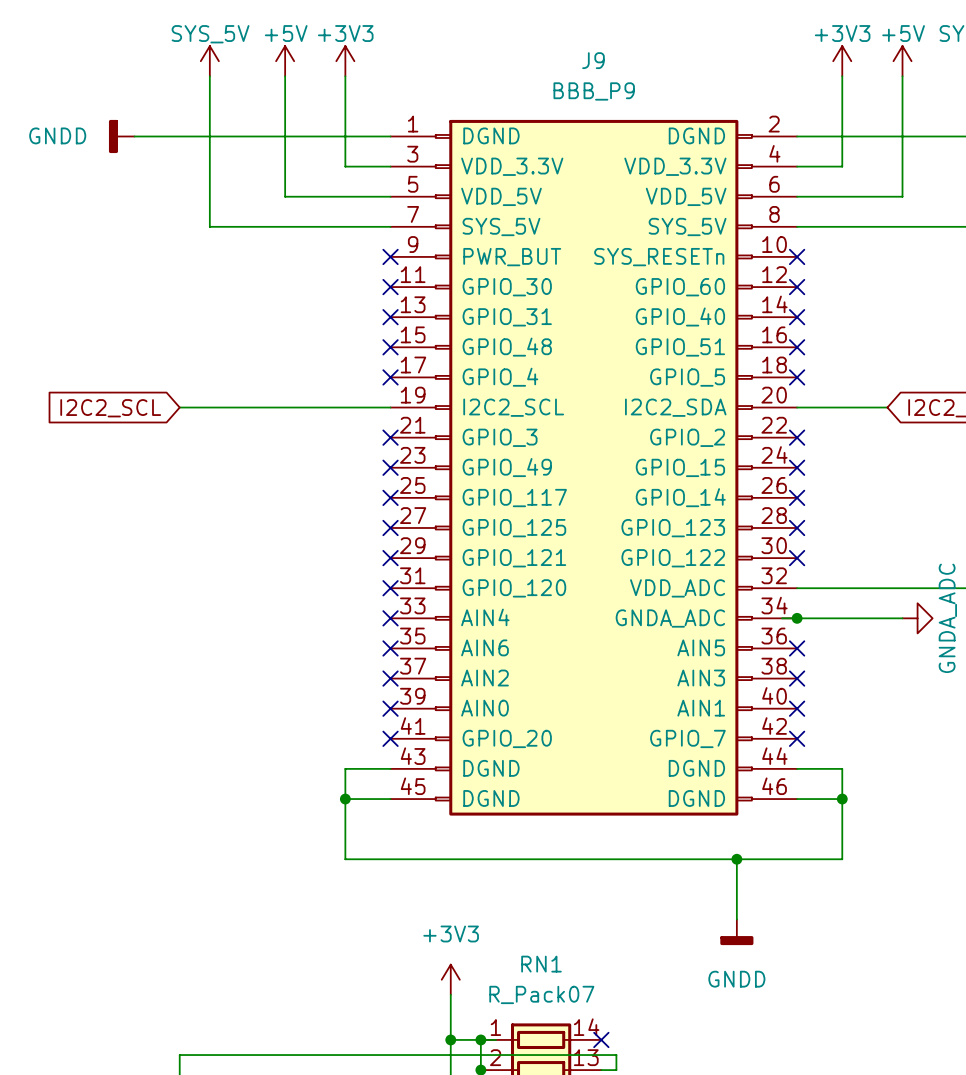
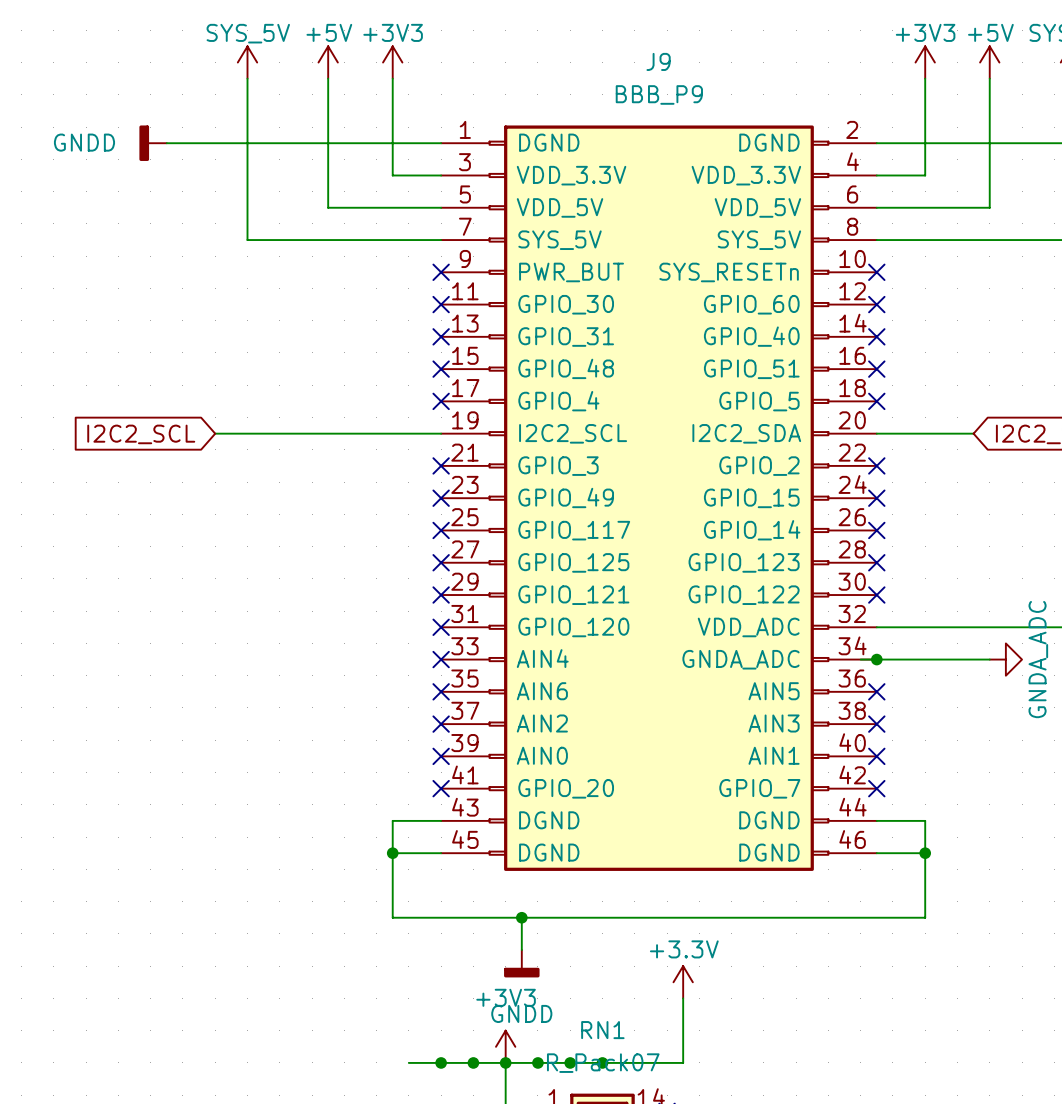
wire: none -> (521, 917) (521, 950)
junction: none -> (521, 917)
wire: (736, 859) (736, 919) -> none
junction: (736, 859) -> none
power symbol: none -> +3.3V (683, 982)
power symbol position: GNDD (736, 932) -> GNDD (521, 963)
wire: none -> (683, 998) (683, 1062) (408, 1062)
junction: none -> (441, 1062)
junction: none -> (473, 1062)
junction: none -> (505, 1062)
junction: none -> (537, 1062)
junction: none -> (570, 1062)
junction: none -> (602, 1062)

